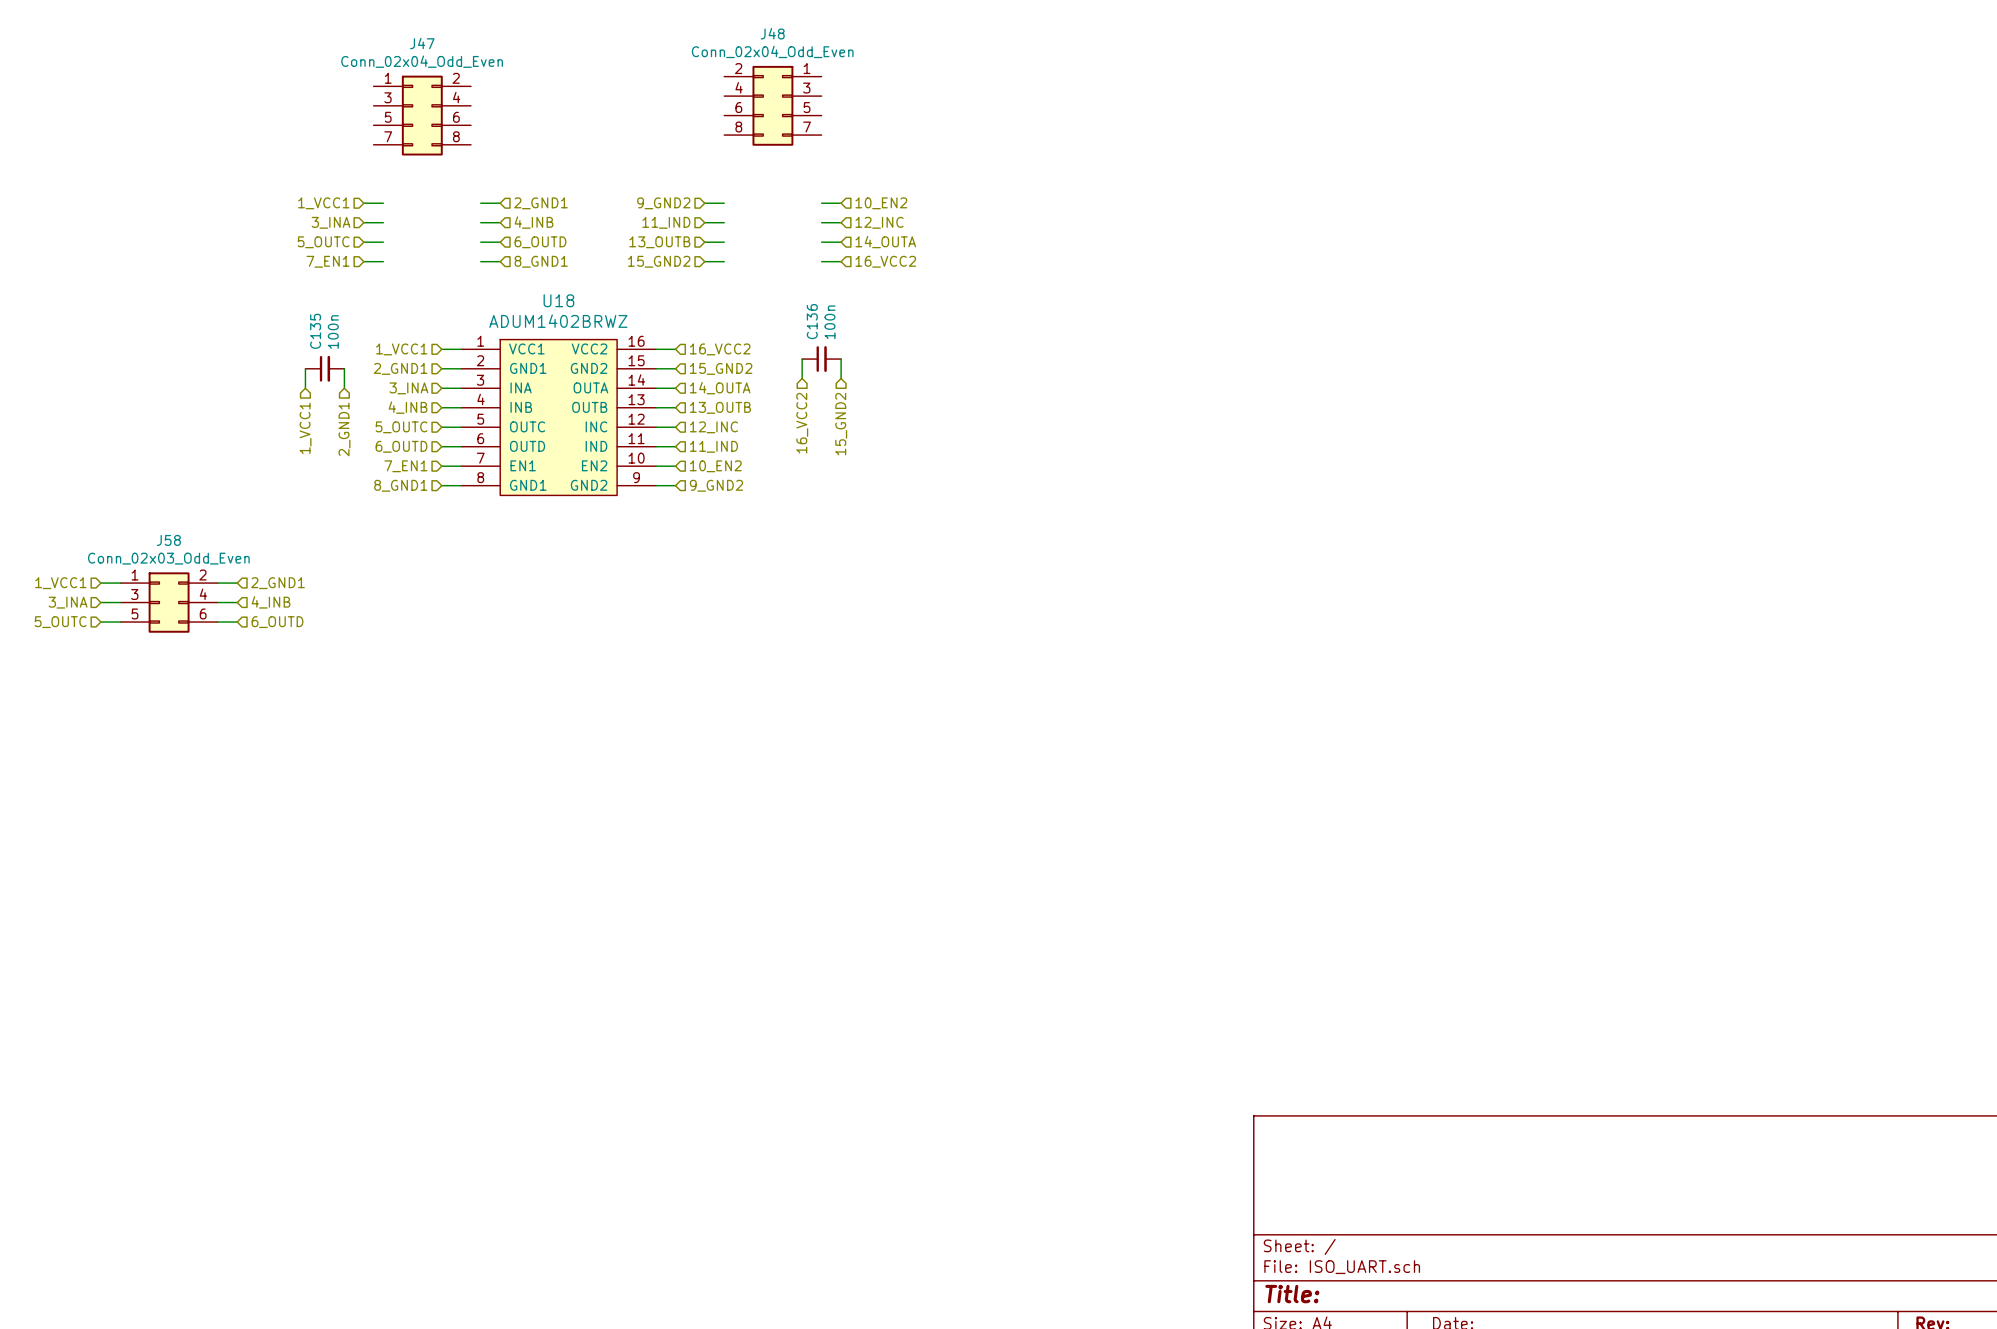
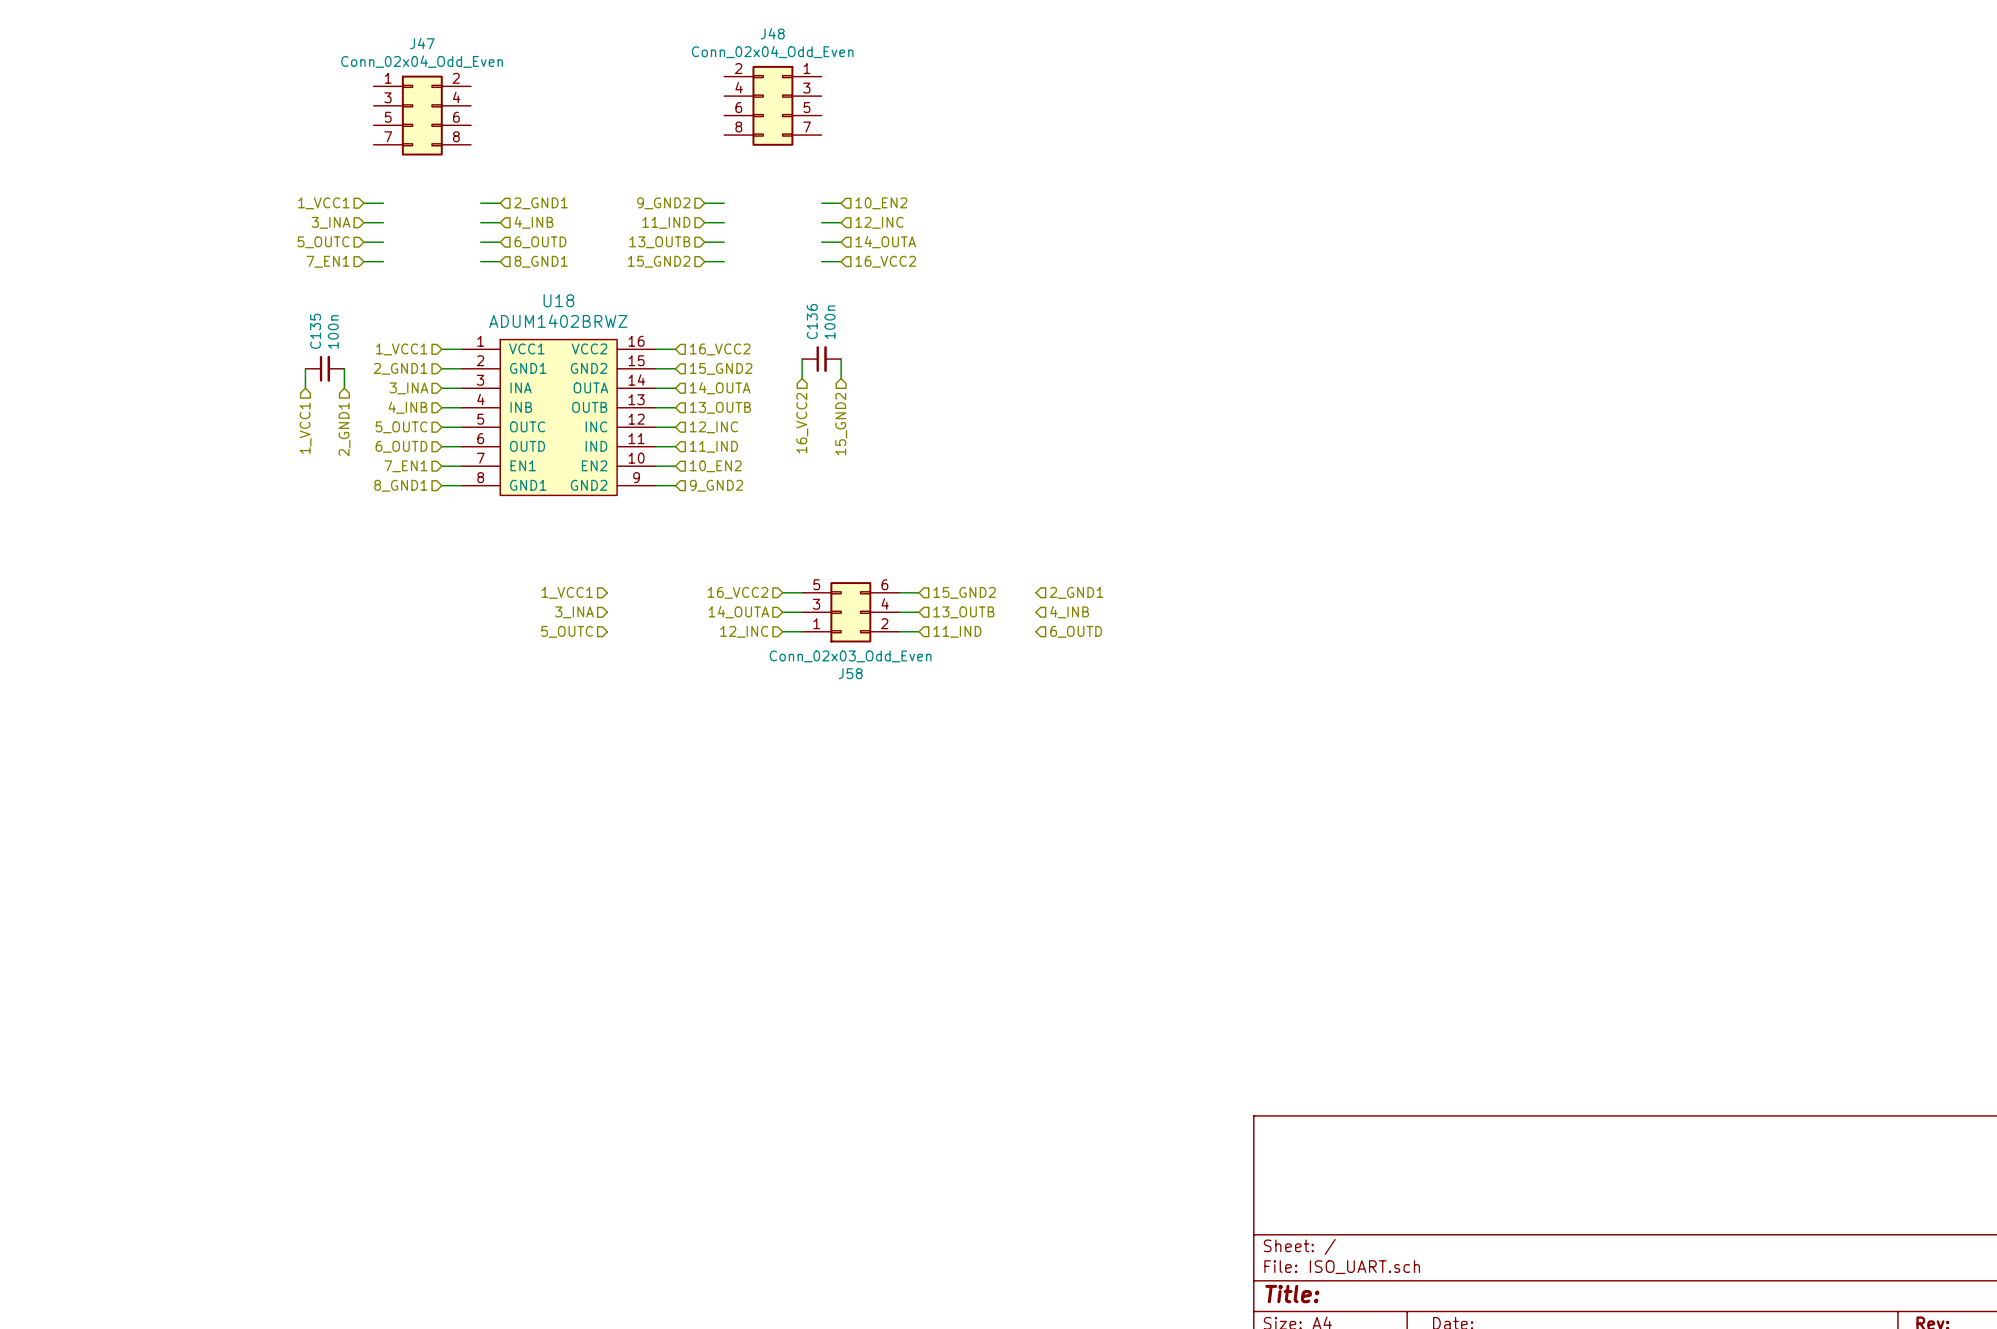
hierarchical label: 1_VCC1 (60, 583) -> none
wire: (100, 583) (120, 583) -> none
wire: (217, 583) (237, 583) -> none
hierarchical label: 2_GND1 (278, 583) -> none
hierarchical label: none -> 1_VCC1 (567, 592)
hierarchical label: none -> 16_VCC2 (737, 592)
wire: none -> (782, 592) (802, 592)
wire: none -> (899, 592) (919, 592)
hierarchical label: none -> 15_GND2 (964, 592)
hierarchical label: none -> 2_GND1 (1076, 592)
hierarchical label: 3_INA (68, 602) -> none
wire: (100, 602) (120, 602) -> none
J58 flip: as is (169, 602) -> up-down (850, 612)
J58 position: (169, 602) -> (850, 612)
wire: (217, 602) (237, 602) -> none
hierarchical label: 4_INB (271, 602) -> none
hierarchical label: none -> 3_INA (574, 612)
hierarchical label: none -> 14_OUTA (738, 612)
wire: none -> (782, 612) (802, 612)
wire: none -> (899, 612) (919, 612)
hierarchical label: none -> 13_OUTB (963, 612)
hierarchical label: none -> 4_INB (1069, 612)
hierarchical label: 5_OUTC (60, 622) -> none
wire: (100, 622) (120, 622) -> none
wire: (217, 622) (237, 622) -> none
hierarchical label: 6_OUTD (277, 622) -> none
hierarchical label: none -> 5_OUTC (567, 631)
hierarchical label: none -> 12_INC (744, 631)
wire: none -> (782, 631) (802, 631)
wire: none -> (899, 631) (919, 631)
hierarchical label: none -> 11_IND (957, 631)
hierarchical label: none -> 6_OUTD (1076, 631)

